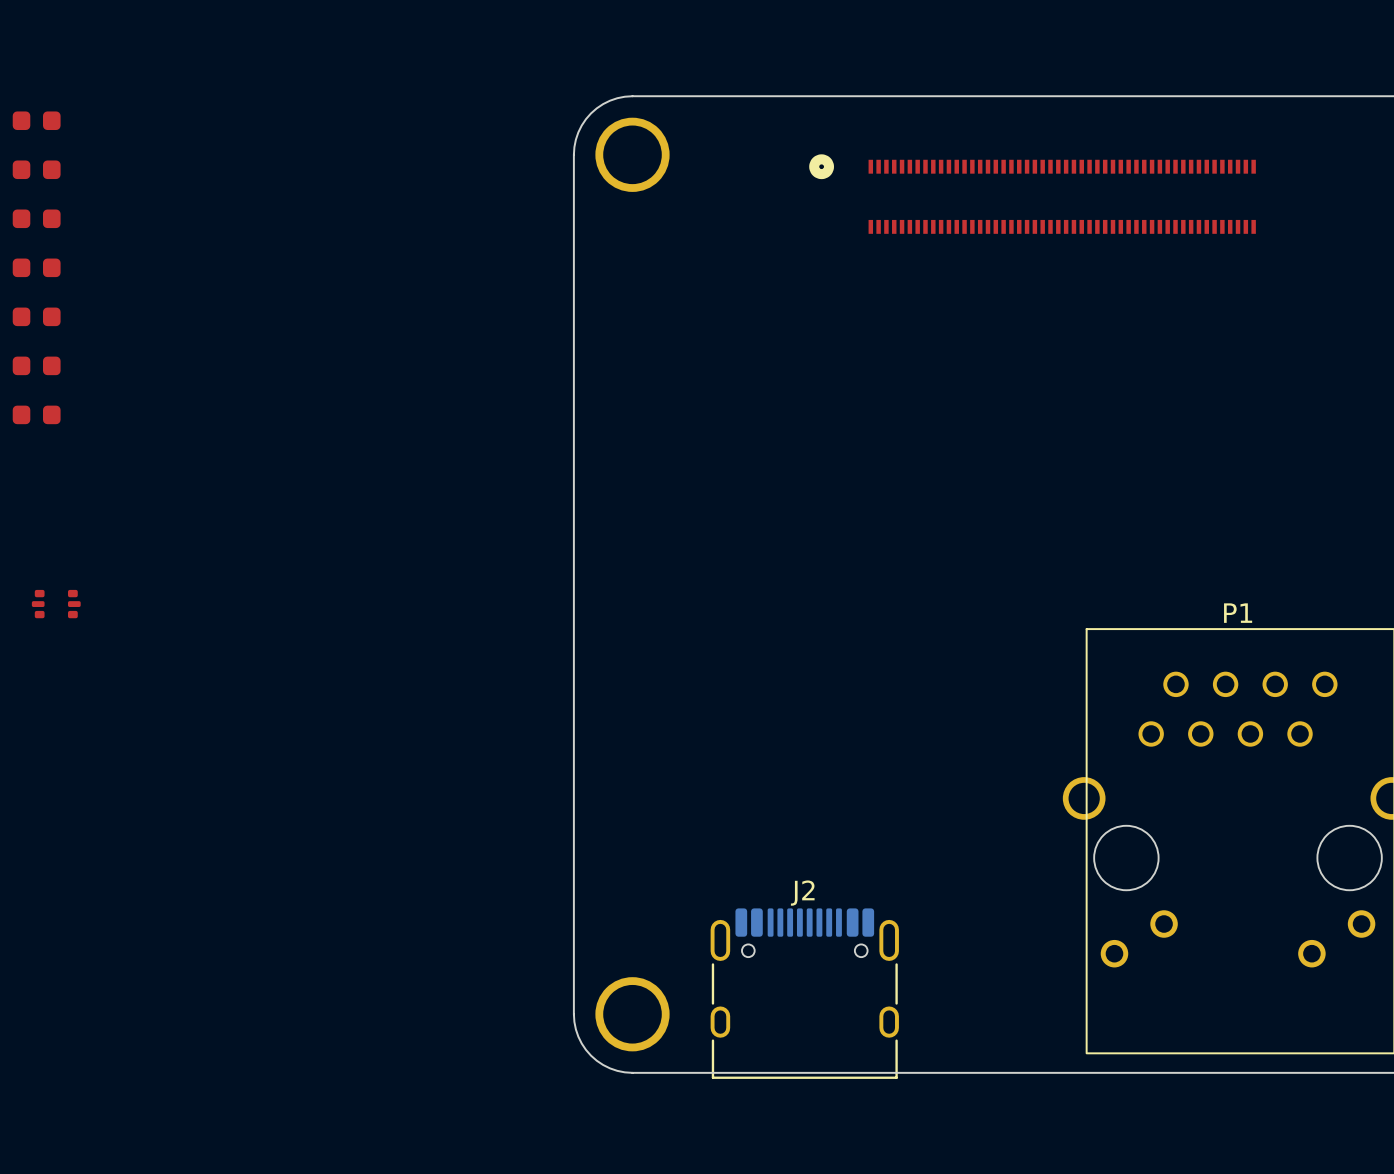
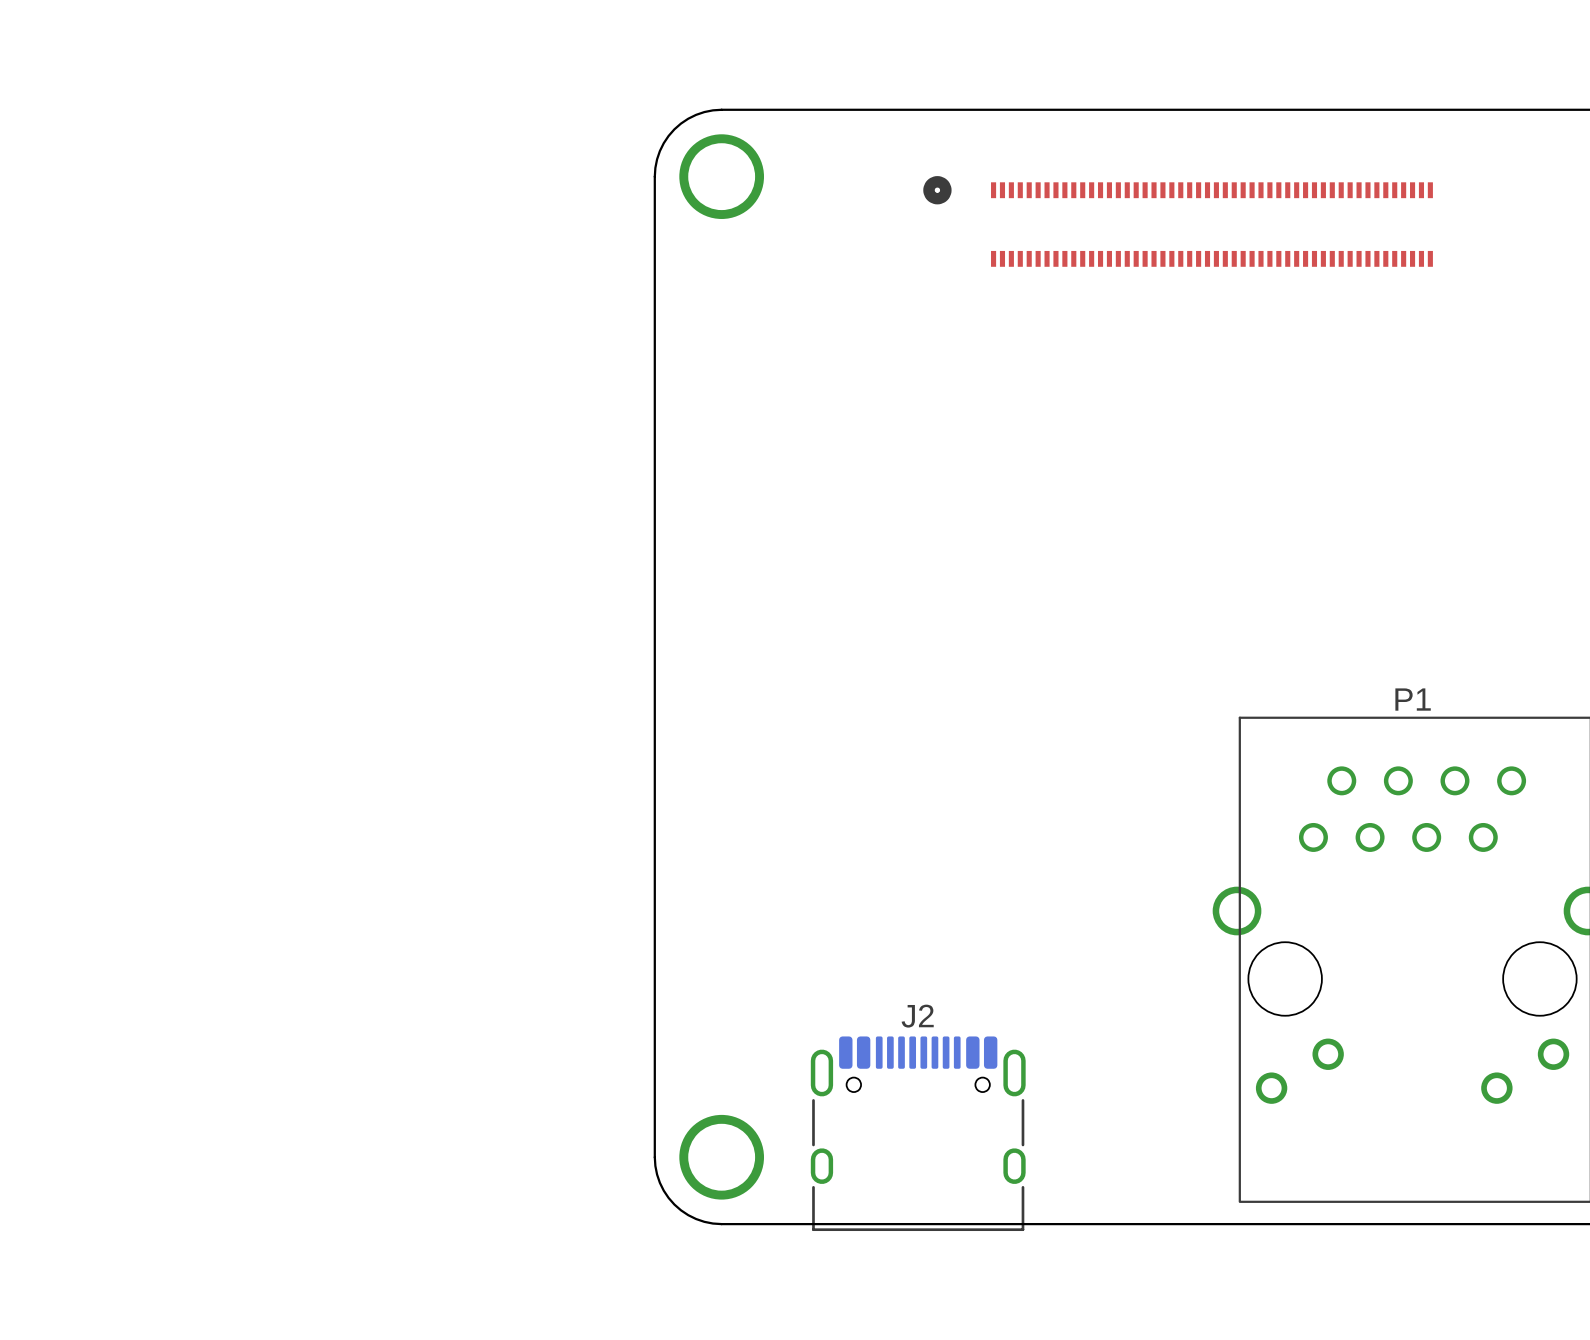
part: (36, 120) -> none
part: (36, 169) -> none
part: (36, 218) -> none
part: (36, 267) -> none
part: (36, 316) -> none
part: (36, 365) -> none
part: (36, 414) -> none
part: (56, 604) -> none

